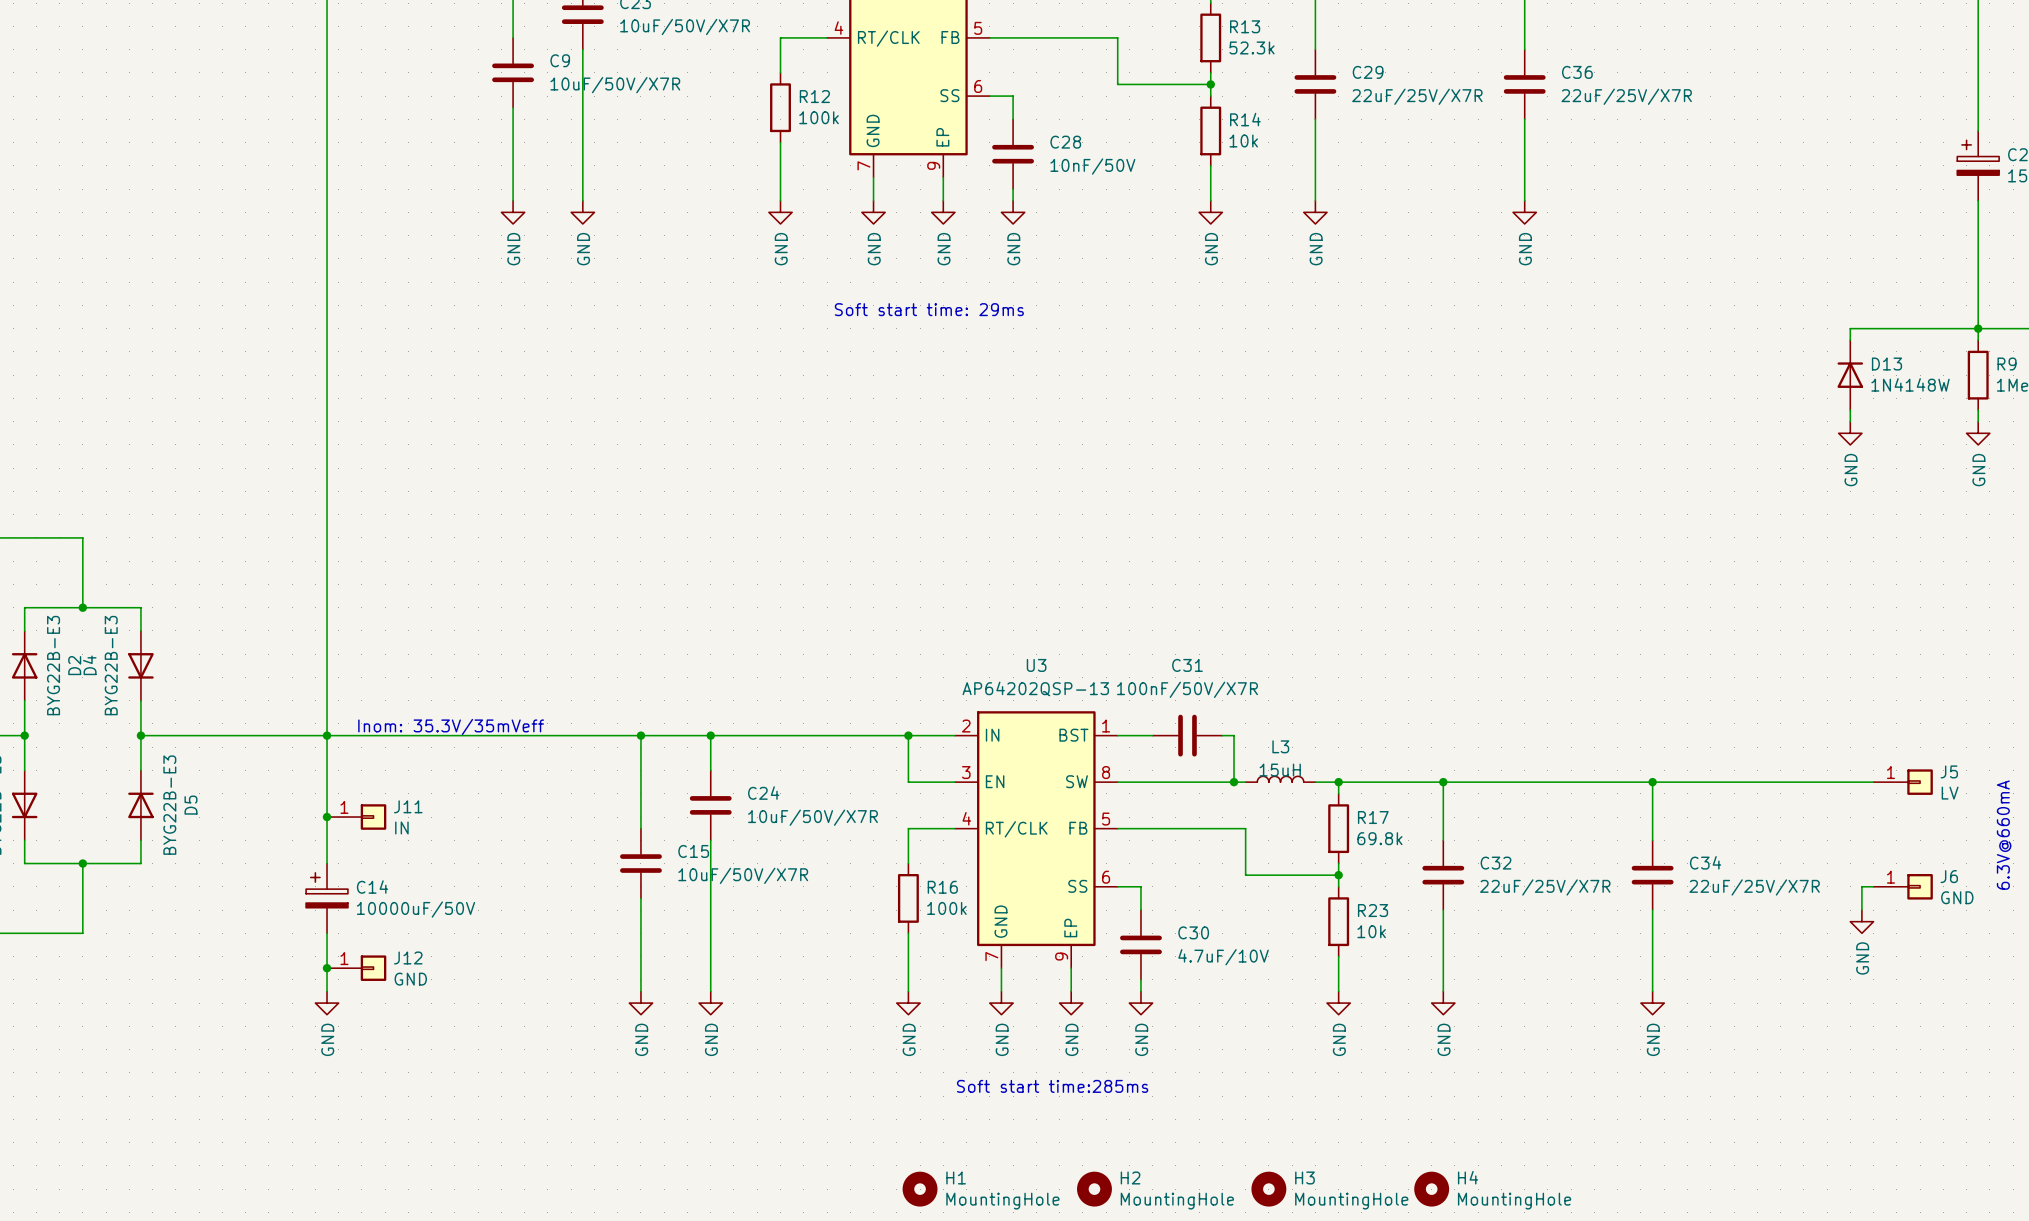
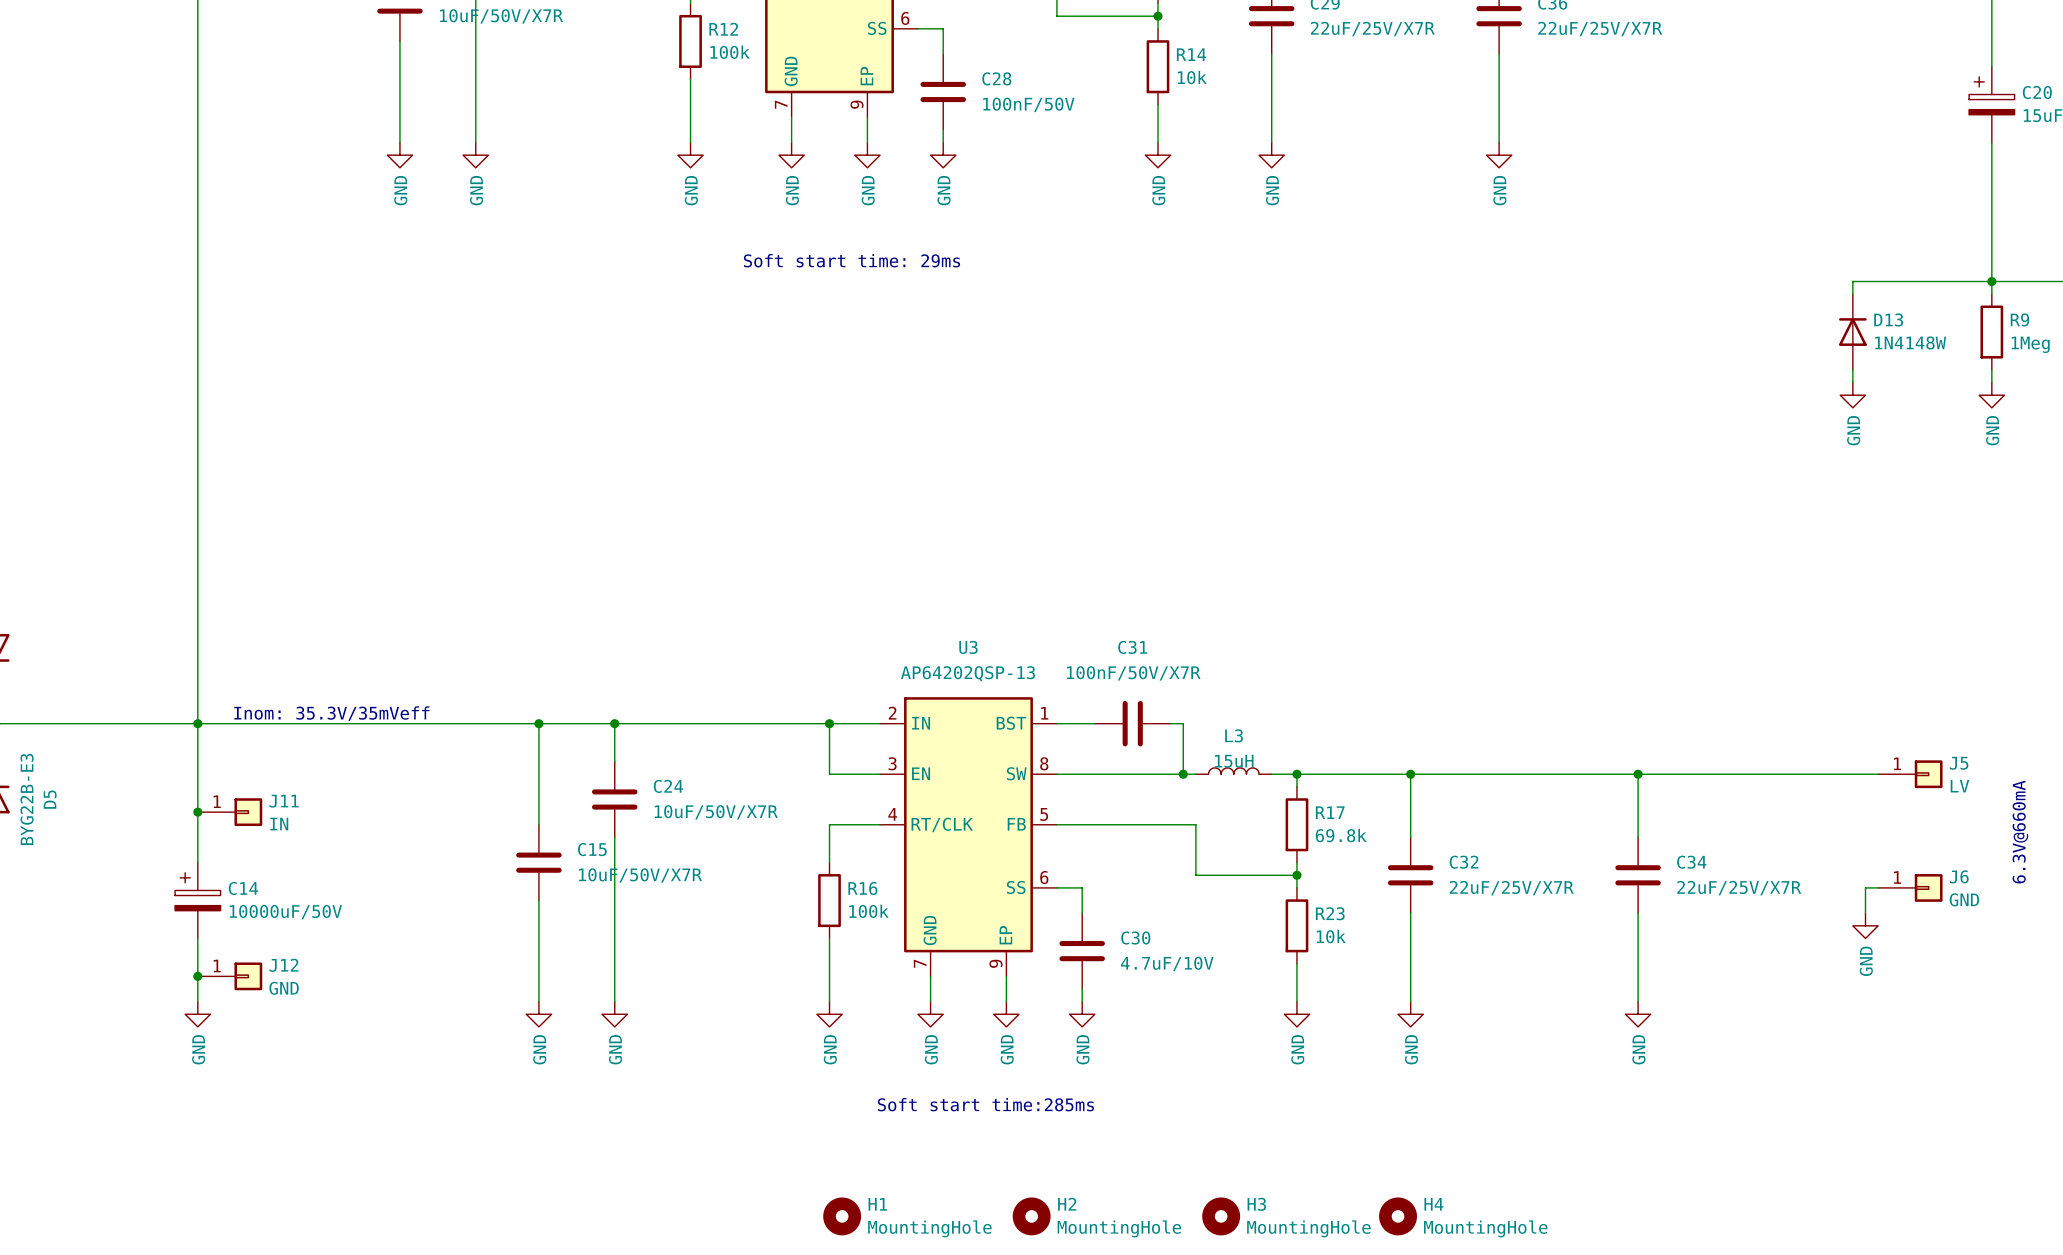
C28 value: 10nF/50V (1092, 166) -> 100nF/50V (1028, 104)

